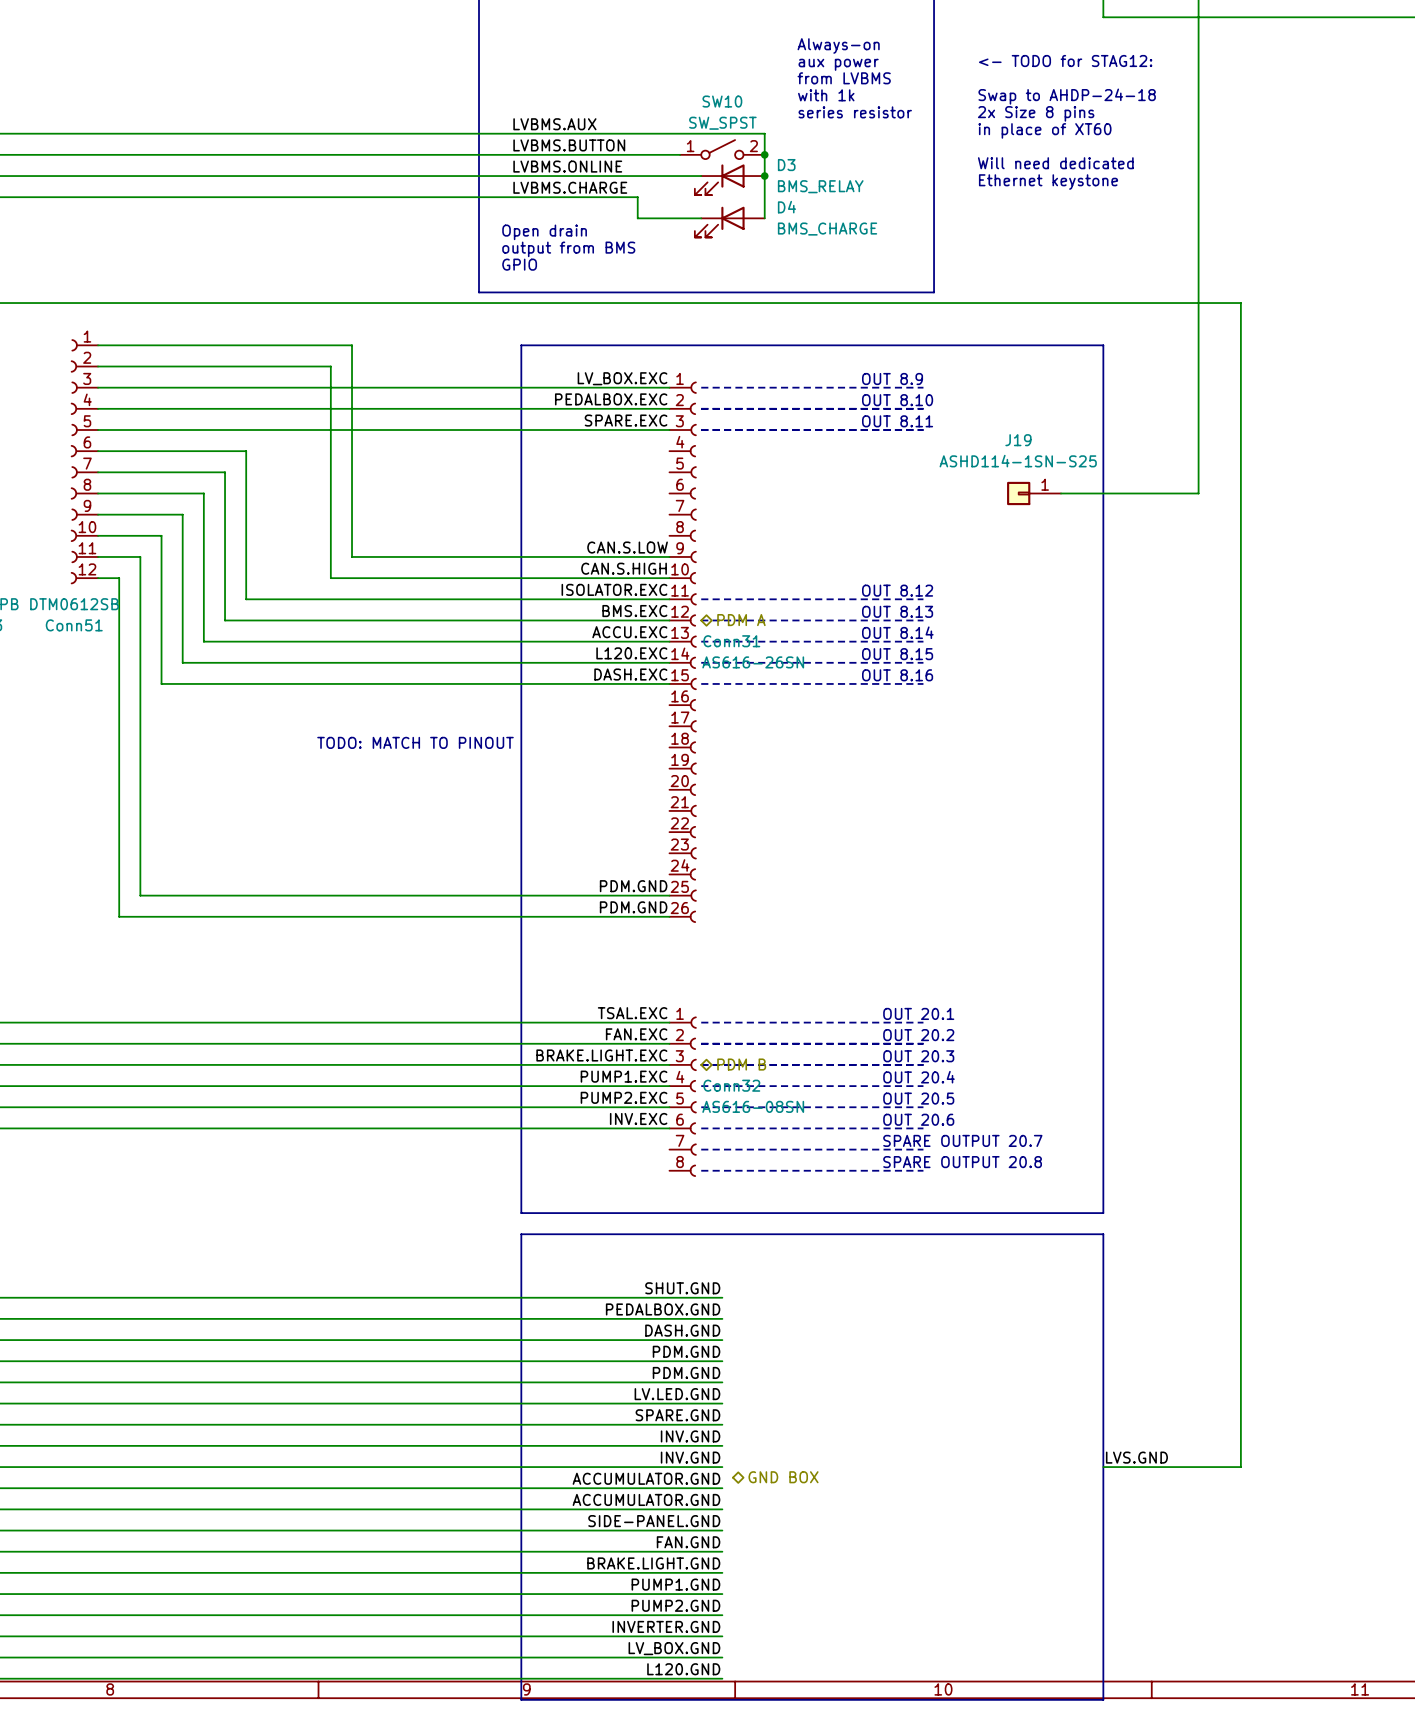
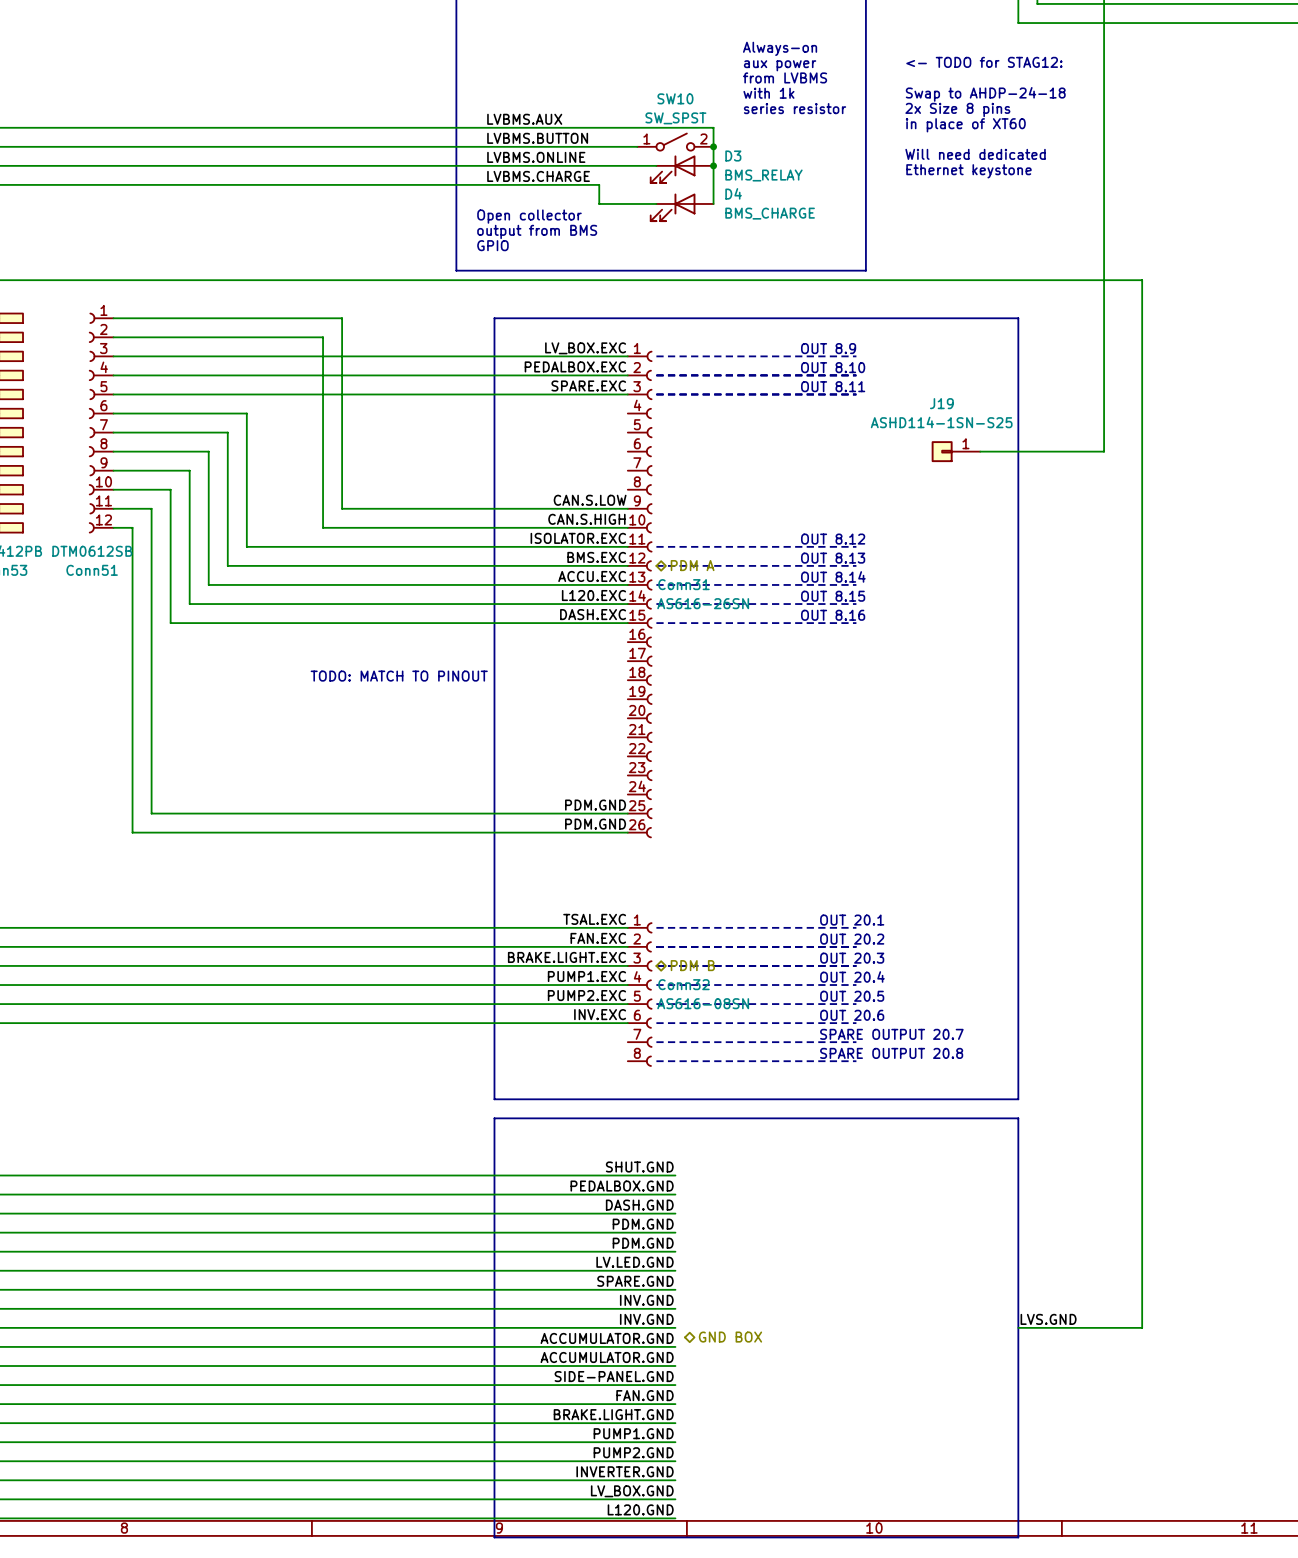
text: Open drain (544, 232) -> Open collector (529, 216)

